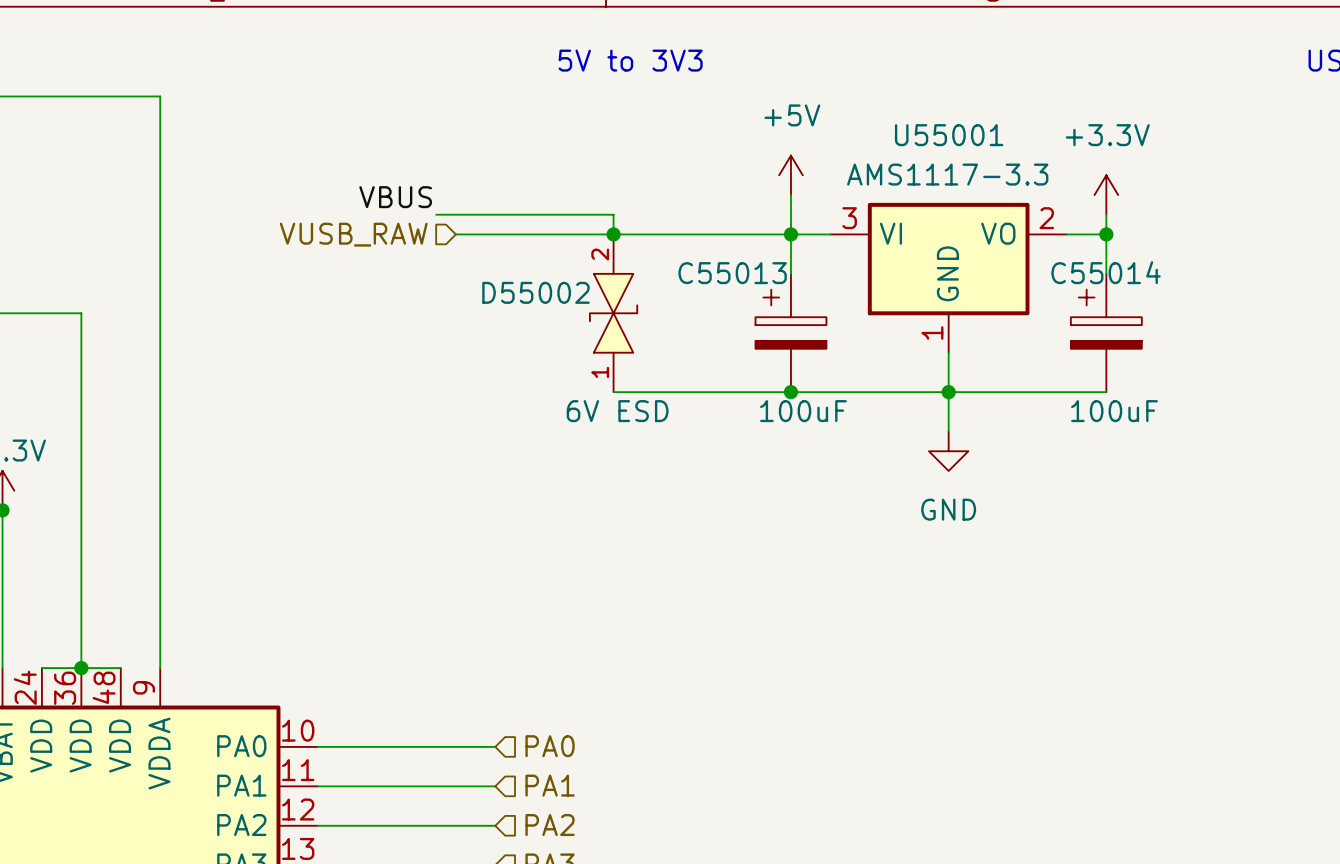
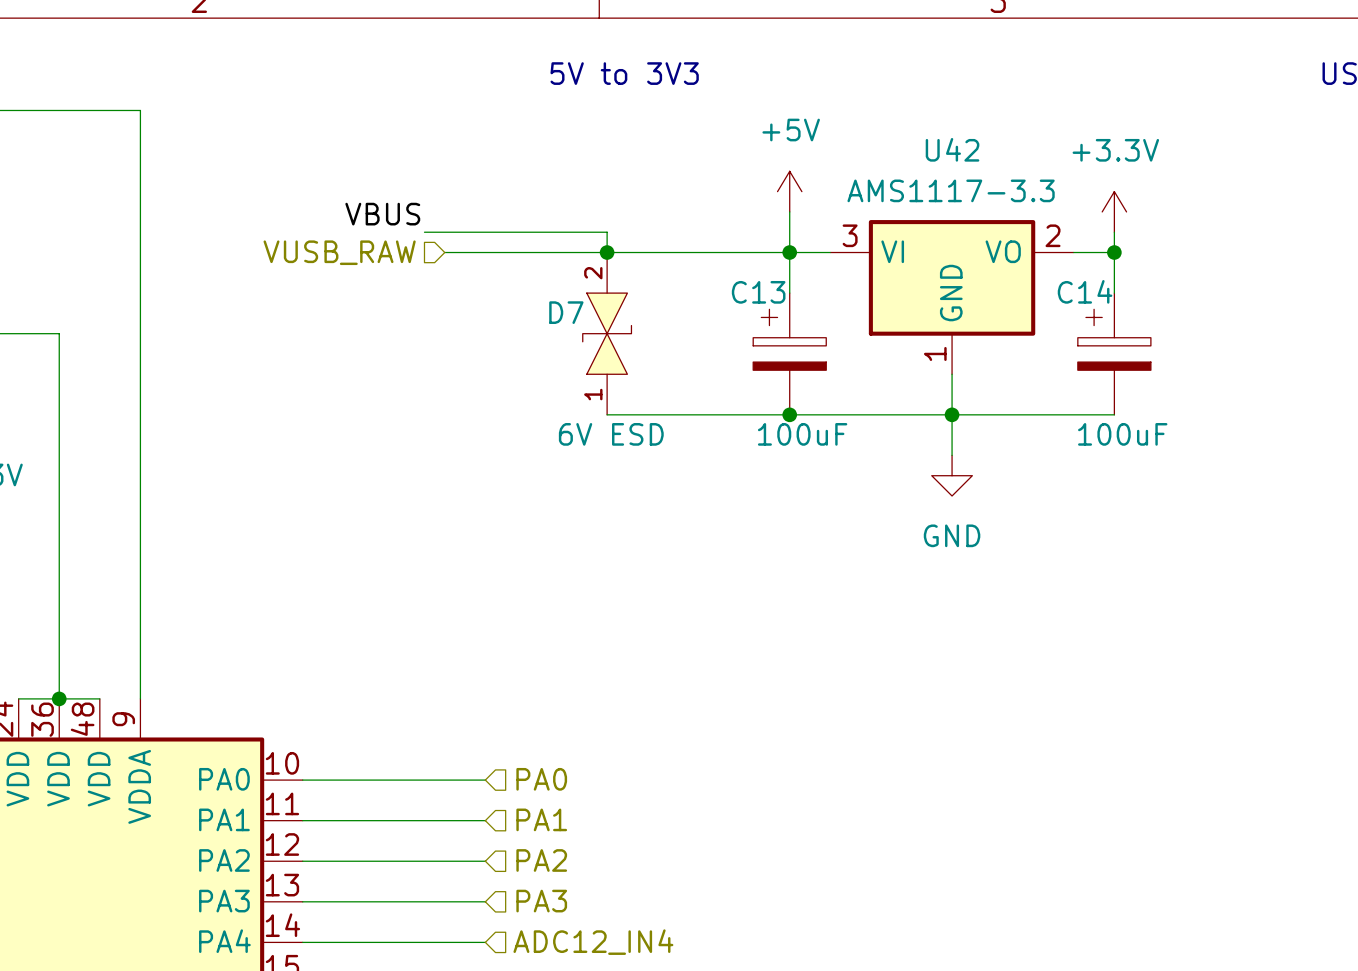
U55001 name: U55001 (949, 135) -> U42 (952, 149)
C55014 name: C55014 (1106, 272) -> C14 (1085, 291)
C55013 name: C55013 (732, 273) -> C13 (758, 292)
D55002 name: D55002 (535, 292) -> D7 (566, 312)

